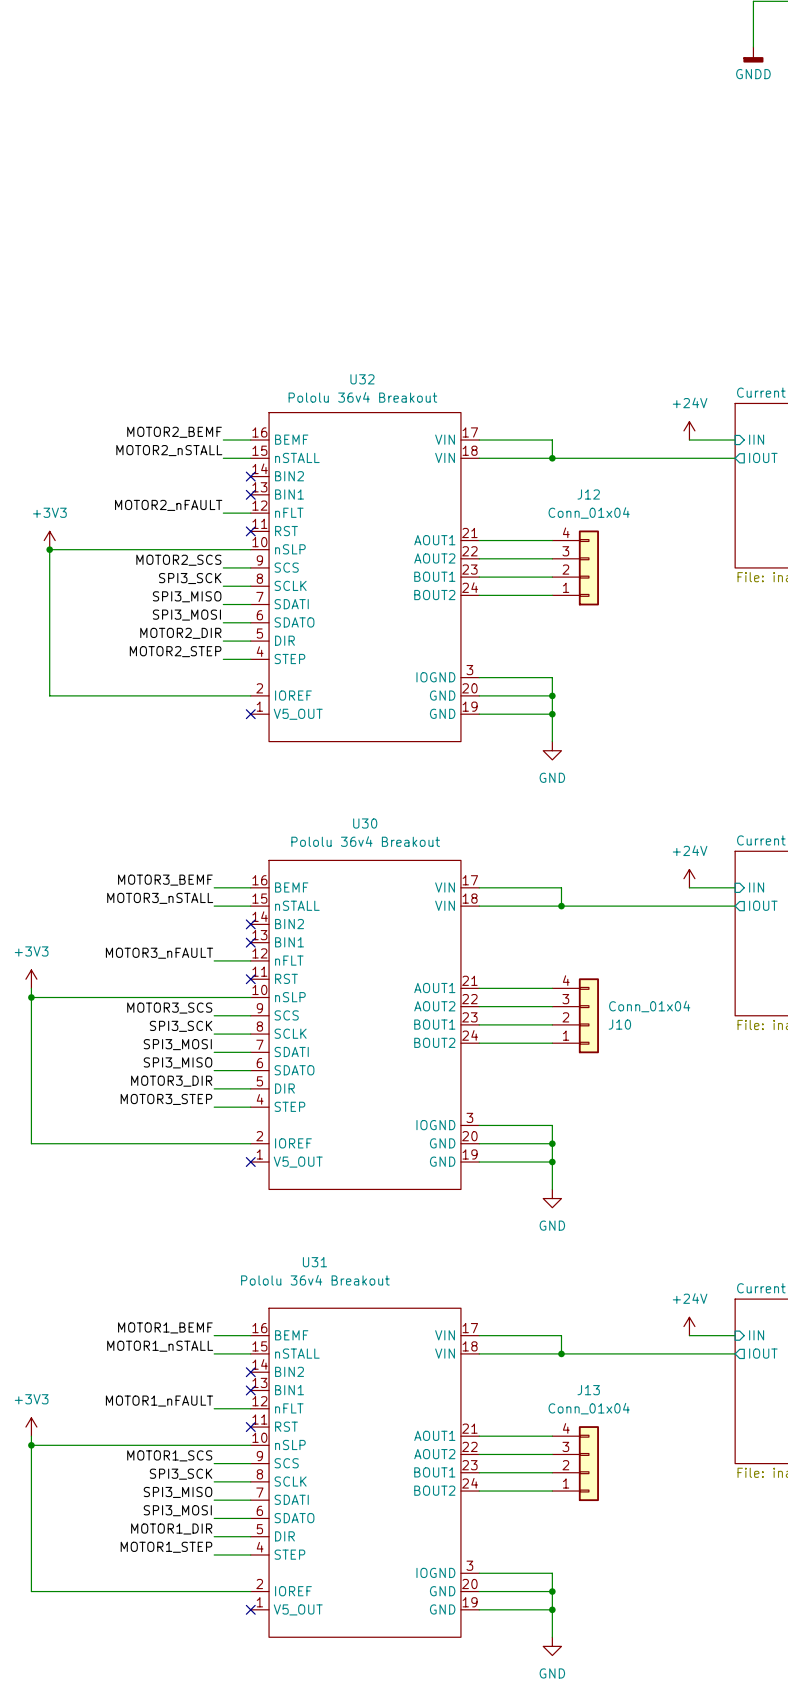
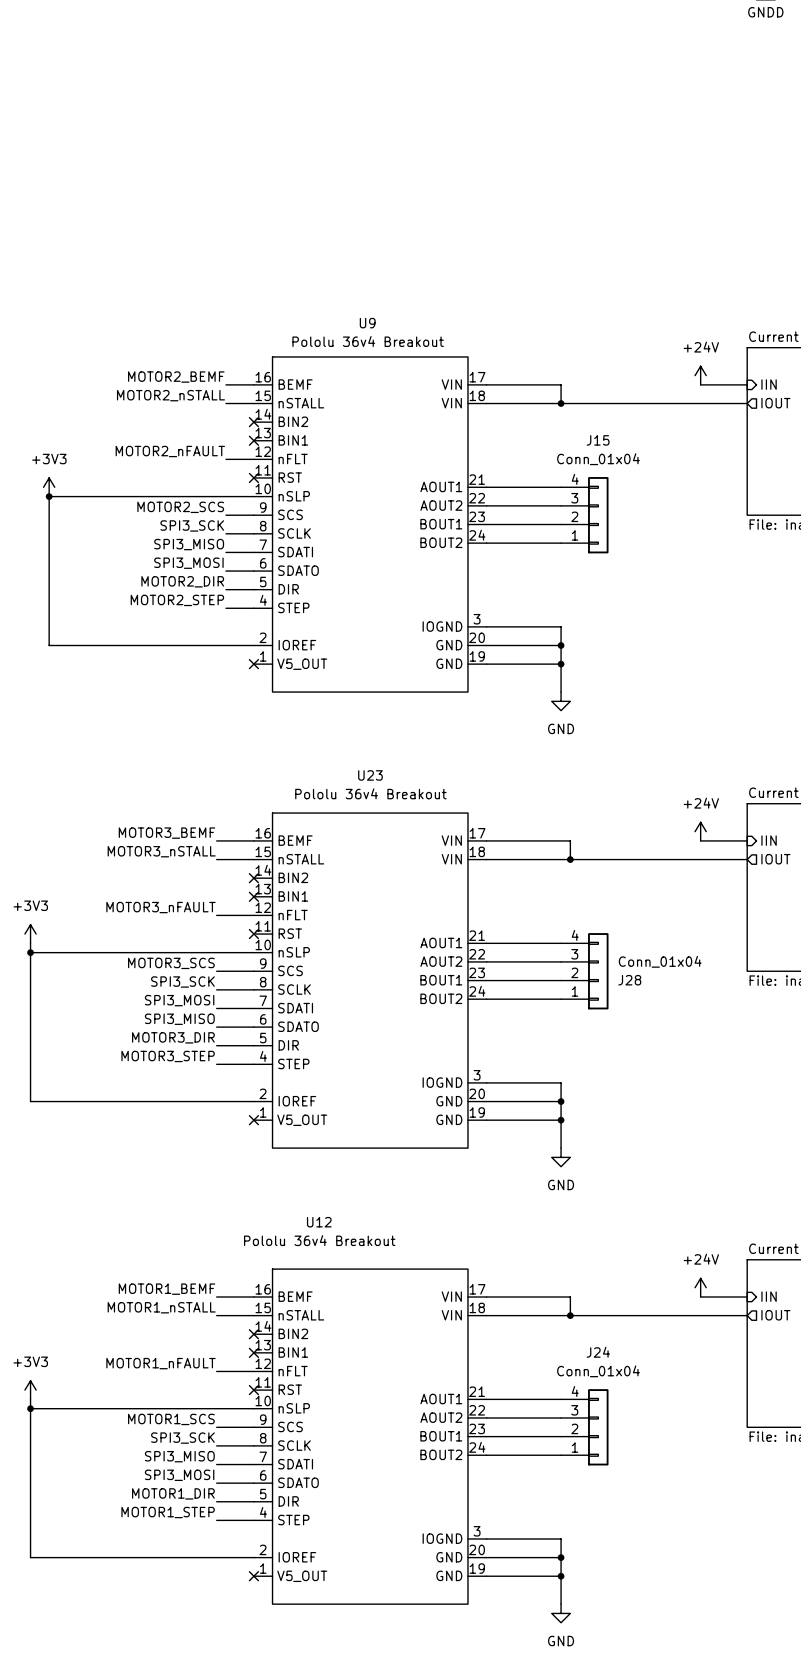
U32 name: U32 (362, 379) -> U9 (367, 323)
J12 name: J12 (588, 494) -> J15 (598, 440)
U30 name: U30 (365, 823) -> U23 (370, 775)
J10 name: J10 (619, 1024) -> J28 (629, 980)
U31 name: U31 (314, 1262) -> U12 (319, 1222)
J13 name: J13 (588, 1390) -> J24 (598, 1352)

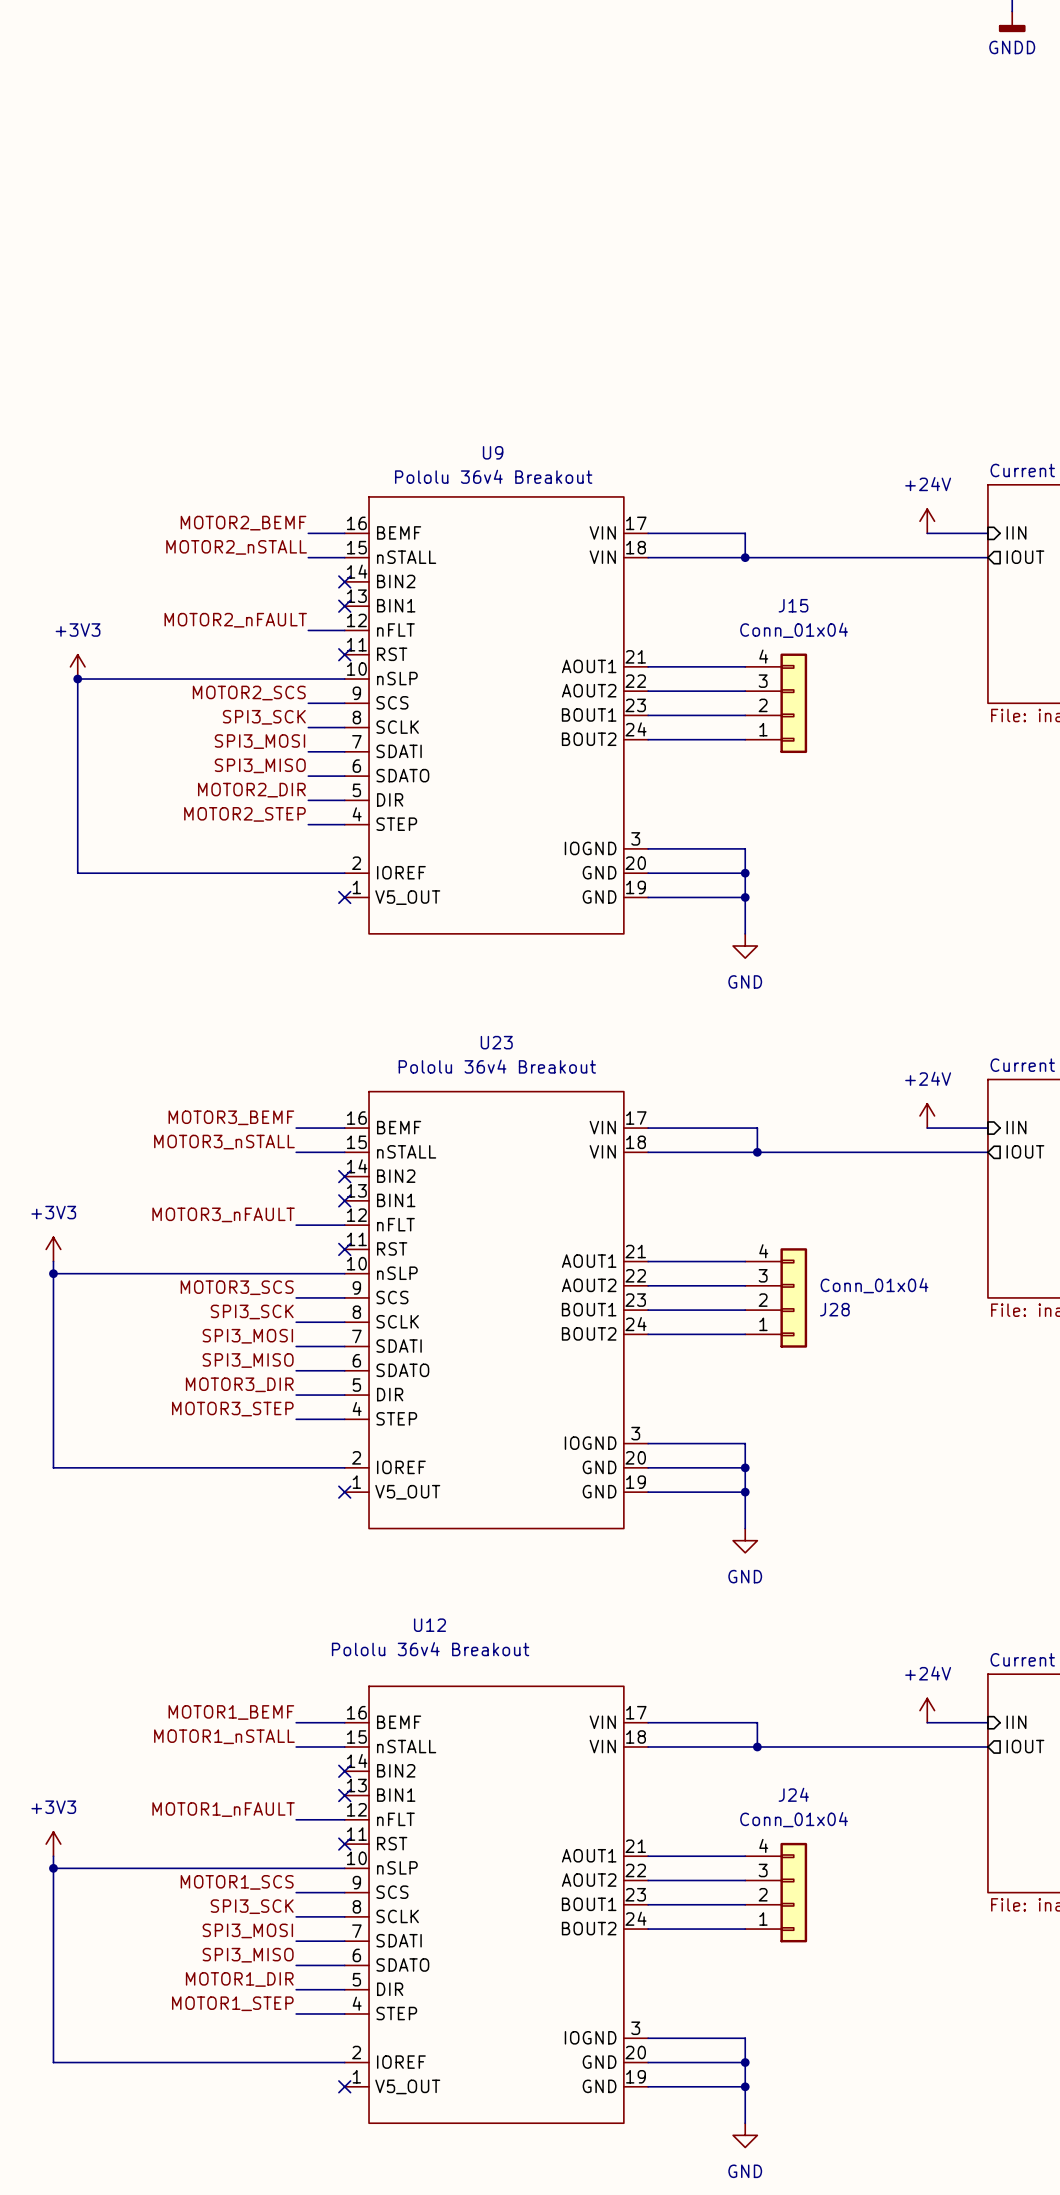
label: SPI3_MISO (189, 544) -> SPI3_MOSI (259, 741)
label: SPI3_MOSI (188, 563) -> SPI3_MISO (260, 765)
label: SPI3_MISO (179, 1456) -> SPI3_MOSI (247, 1930)
label: SPI3_MOSI (179, 1475) -> SPI3_MISO (248, 1955)

